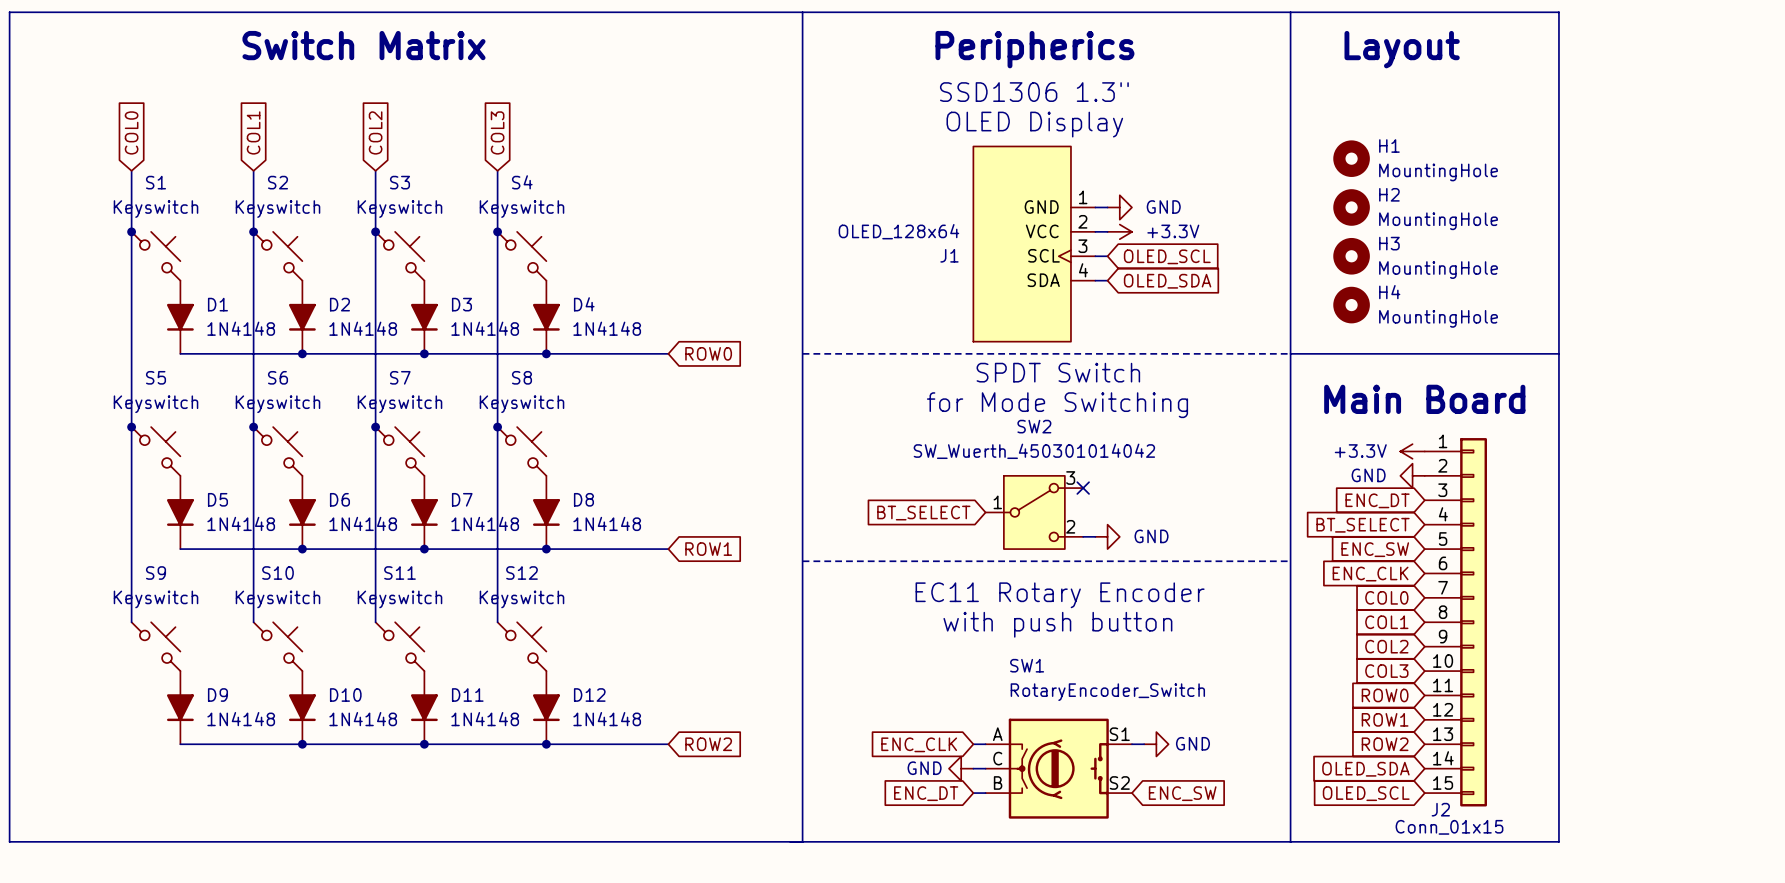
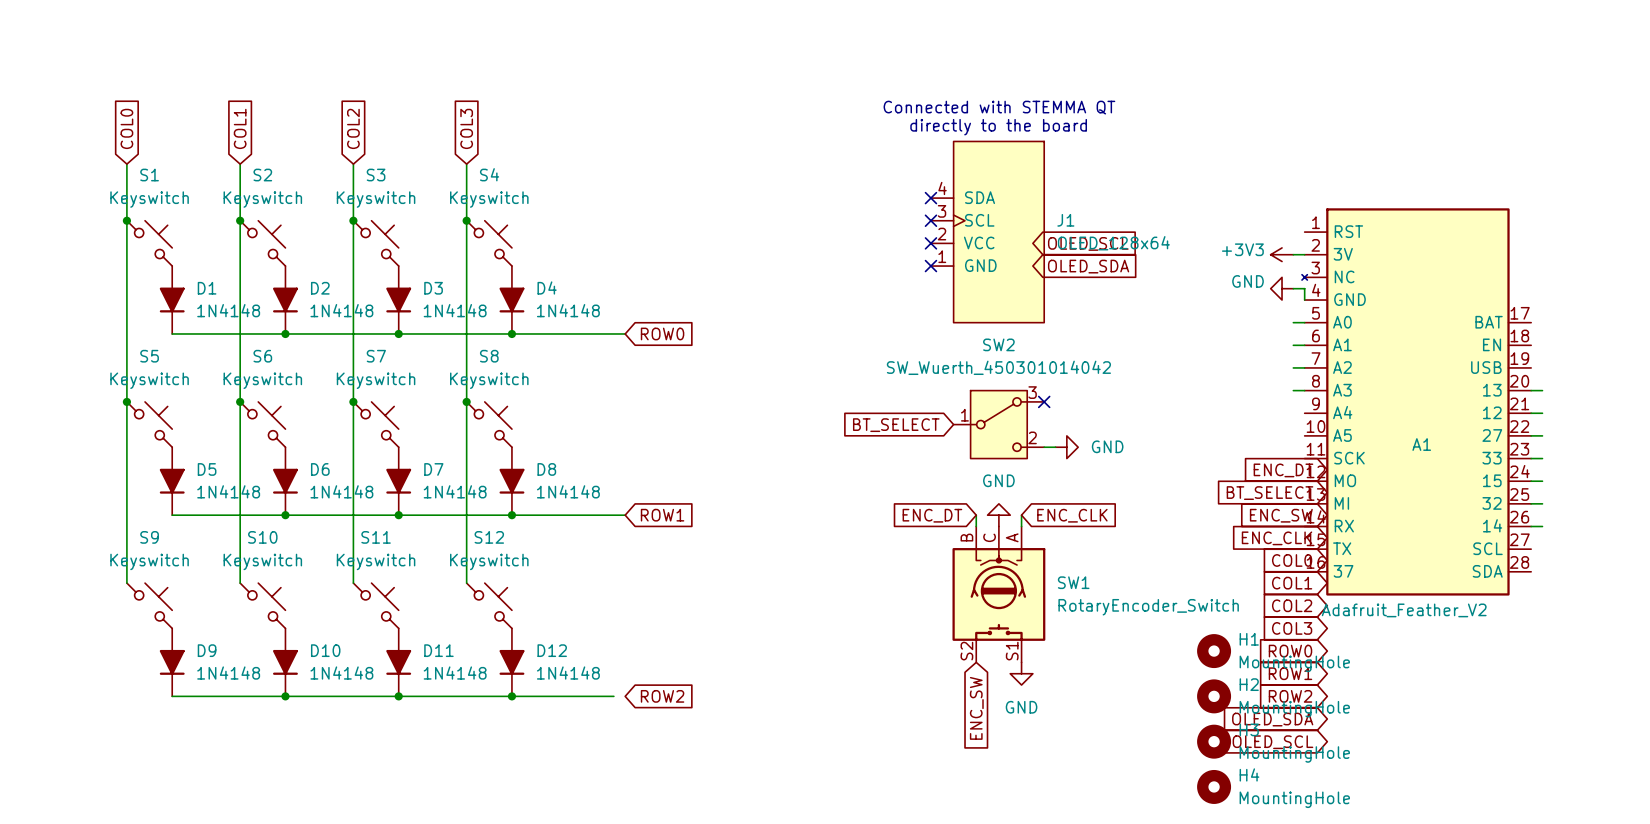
line: (9, 12) (9, 841) (1558, 841) (1558, 12) (9, 12) -> none
line: (802, 12) (802, 841) -> none
line: (1290, 12) (1290, 841) -> none
text: Switch Matrix (363, 45) -> none
text: Peripherics (1034, 49) -> none
text: Layout (1402, 49) -> none
text: SSD1306 1.3" (1034, 92) -> none
text: none -> Connected with STEMMA QT (999, 107)
text: OLED Display (1034, 124) -> none
text: none -> directly to the board (998, 127)
H1 position: (1351, 158) -> (1214, 651)
no-connect mark: none -> (930, 198)
power symbol: GND (1119, 207) -> none
H2 position: (1351, 207) -> (1214, 696)
no-connect mark: none -> (930, 220)
power symbol: +3.3V (1119, 231) -> none
J1 rotation: 0° (1022, 244) -> 180° (998, 232)
no-connect mark: none -> (930, 243)
H3 position: (1351, 256) -> (1214, 741)
power symbol: none -> +3V3 (1282, 254)
wire: none -> (1293, 254) (1304, 254)
no-connect mark: none -> (930, 266)
H4 position: (1351, 305) -> (1214, 786)
power symbol: none -> GND (1282, 288)
wire: none -> (1293, 288) (1304, 288) (1304, 300)
wire: none -> (1293, 322) (1304, 322)
line: (802, 353) (1558, 353) -> none
wire: none -> (1293, 345) (1304, 345)
text: SPDT Switch (1058, 372) -> none
wire: none -> (1293, 367) (1304, 367)
text: Main Board (1424, 399) -> none
text: for Mode Switching (1057, 405) -> none
wire: none -> (1293, 390) (1304, 390)
wire: none -> (1531, 390) (1542, 390)
no-connect mark: none -> (1044, 401)
A1: none -> Adafruit_Feather_V2 (1416, 401)
wire: none -> (1531, 413) (1542, 413)
power symbol: +3.3V (1412, 451) -> none
wire: none -> (1531, 435) (1542, 435)
power symbol: none -> GND (1066, 447)
power symbol: GND (1412, 475) -> none
no-connect mark: (1083, 488) -> none
wire: none -> (1531, 458) (1542, 458)
SW2 position: (1034, 512) -> (998, 424)
wire: none -> (1531, 481) (1542, 481)
global label position: BT_SELECT (923, 513) -> BT_SELECT (896, 425)
wire: (1083, 536) (1095, 536) -> (1044, 447) (1055, 447)
power symbol: GND (1107, 536) -> none
wire: none -> (1531, 503) (1542, 503)
global label: none -> ENC_DT (932, 515)
wire: none -> (976, 515) (976, 526)
power symbol: none -> GND (998, 515)
wire: none -> (1021, 515) (1021, 526)
line: (802, 561) (1290, 561) -> none
wire: none -> (1531, 526) (1542, 526)
text: EC11 Rotary Encoder (1060, 595) -> none
J2: Conn_01x15 (1455, 622) -> none
text: with push button (1057, 624) -> none
SW1 name position: SW1 (1027, 665) -> SW1 (1073, 582)
SW1 value position: RotaryEncoder_Switch (1107, 692) -> RotaryEncoder_Switch (1148, 607)
wire: (656, 744) (668, 744) -> none
global label rotation: 0° (919, 744) -> 180° (1072, 515)
global label position: ENC_CLK (919, 744) -> ENC_CLK (1072, 515)
wire: (973, 744) (985, 744) -> none
wire: (1131, 744) (1144, 744) -> none
power symbol rotation: 0° (1156, 744) -> 90° clockwise (1021, 673)
power symbol position: GND (1156, 744) -> GND (1021, 673)
power symbol: GND (961, 768) -> none
wire: (973, 768) (985, 768) -> none
SW1 rotation: 0° (1058, 768) -> 90° clockwise (998, 594)
SW1 position: (1058, 768) -> (998, 594)
global label: ENC_DT (926, 793) -> none
wire: (973, 793) (985, 793) -> none
global label rotation: 0° (1182, 793) -> 90° clockwise (976, 708)
global label position: ENC_SW (1182, 793) -> ENC_SW (976, 708)

